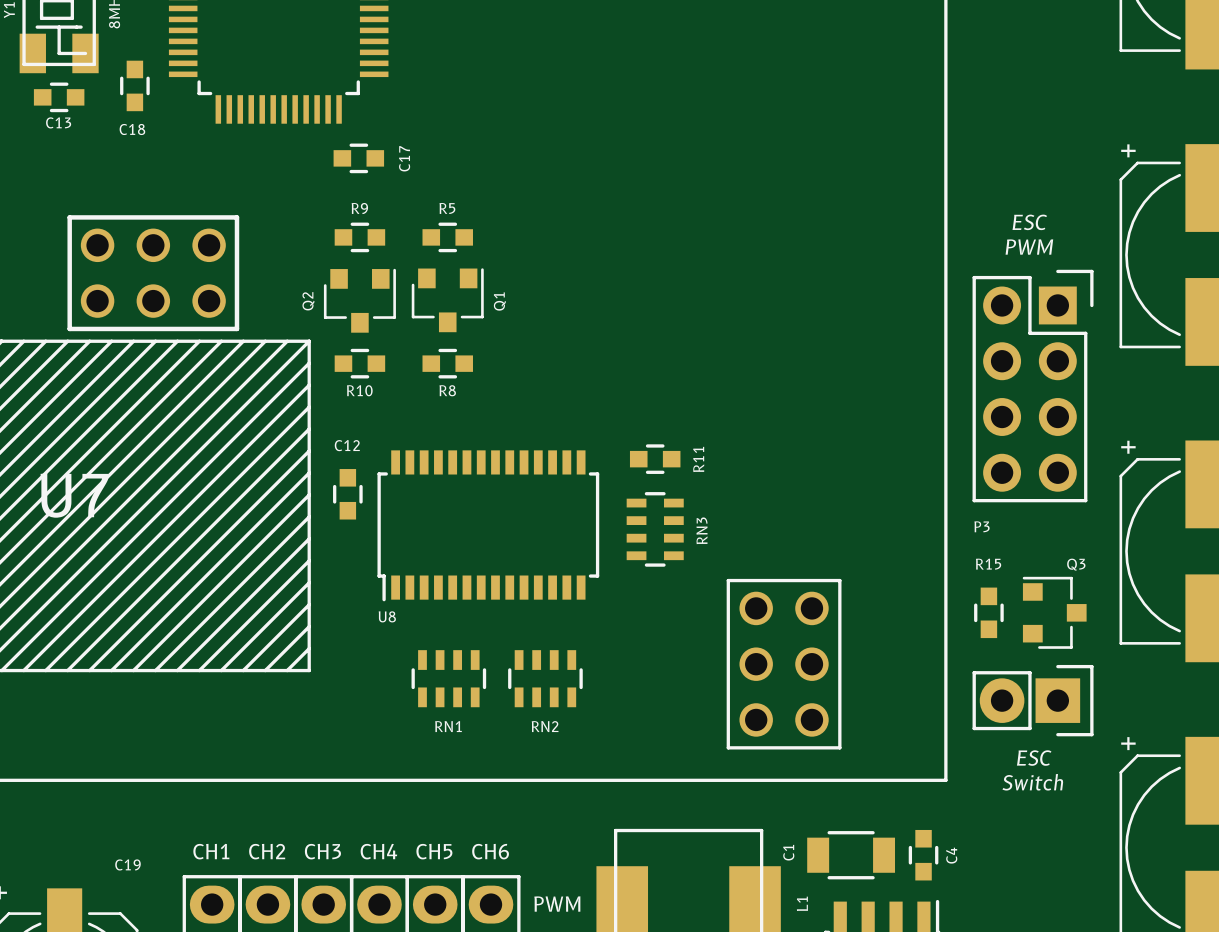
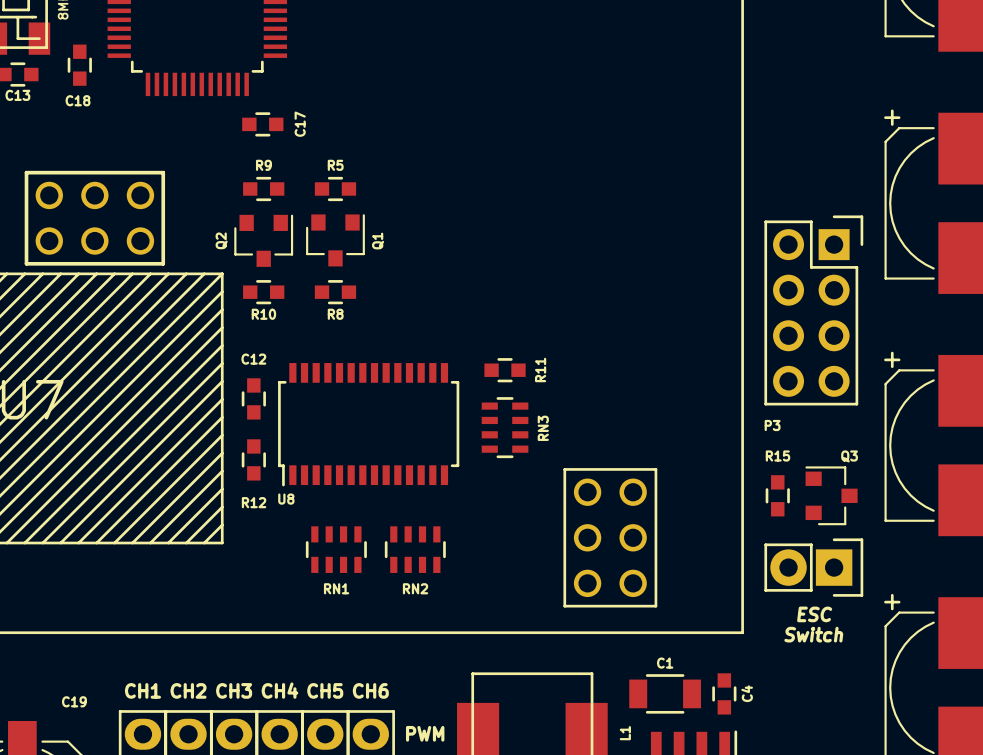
text: ESC (1029, 222) -> none
text: PWM (1029, 247) -> none
R12: none -> (253, 459)
C1 name rotation: 0° (788, 852) -> 90° clockwise (665, 663)
C1 name position: C1 (788, 852) -> C1 (665, 663)

